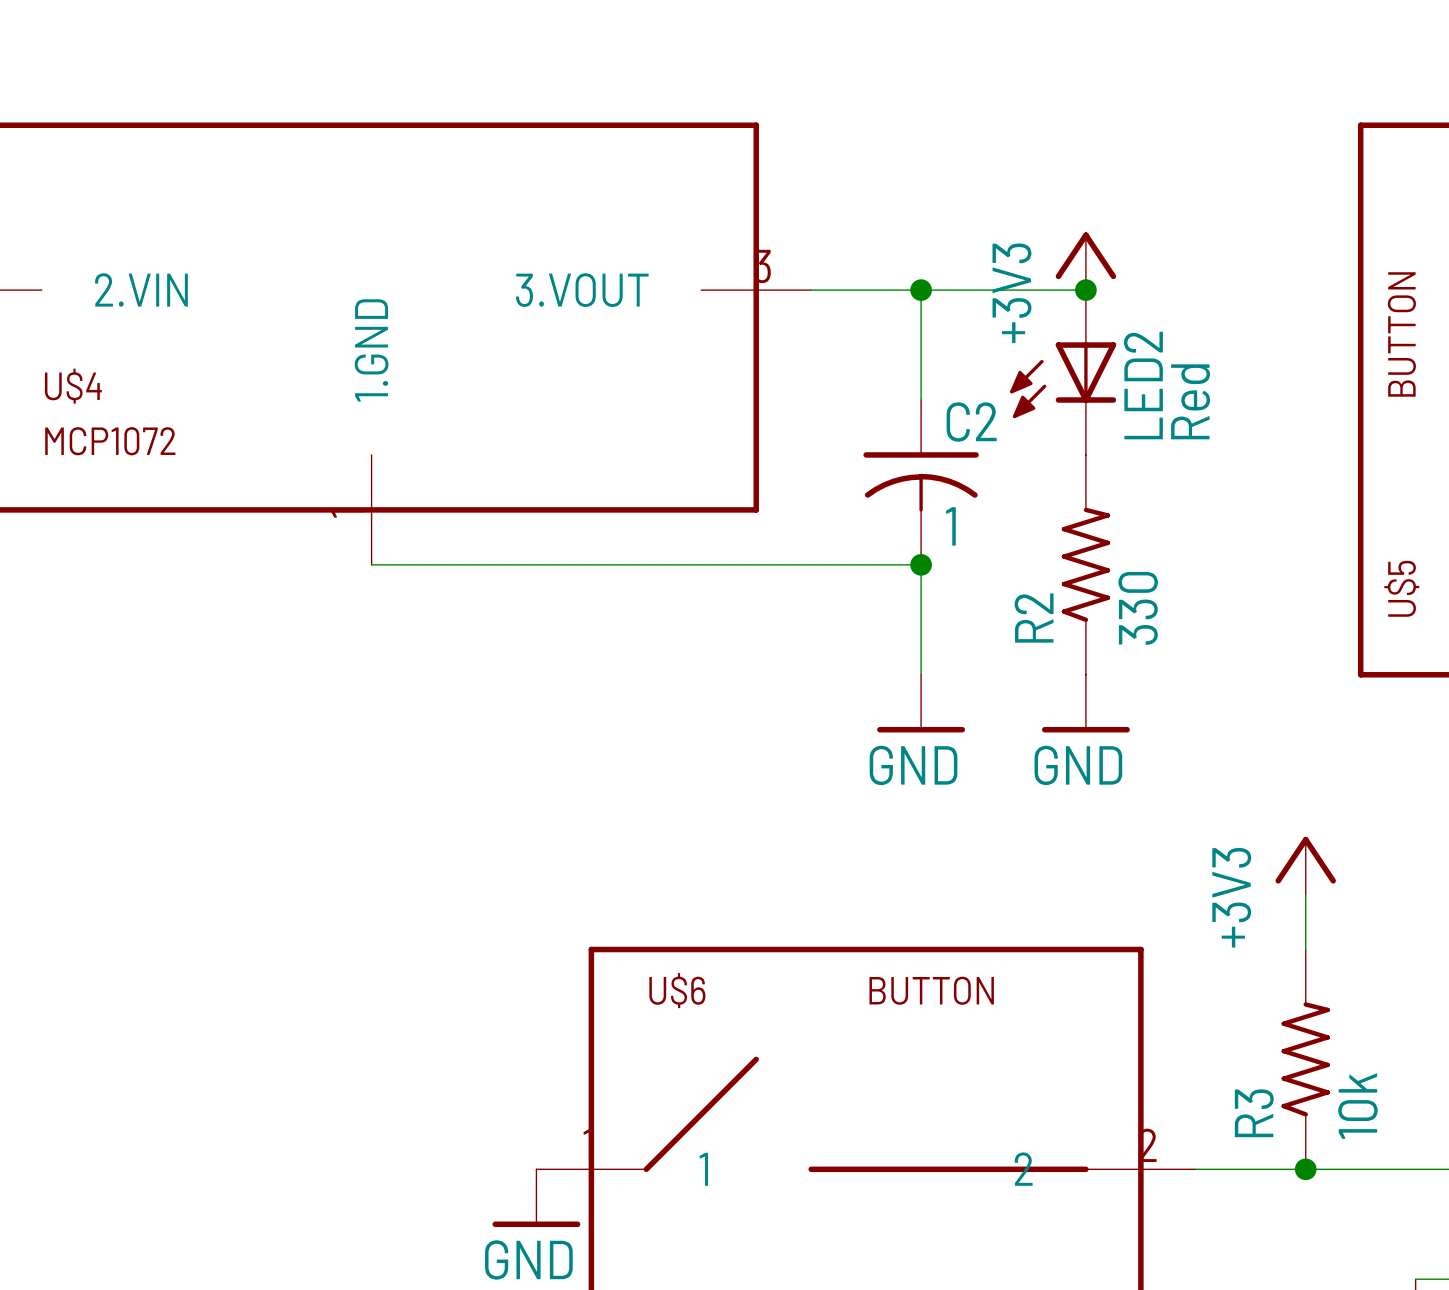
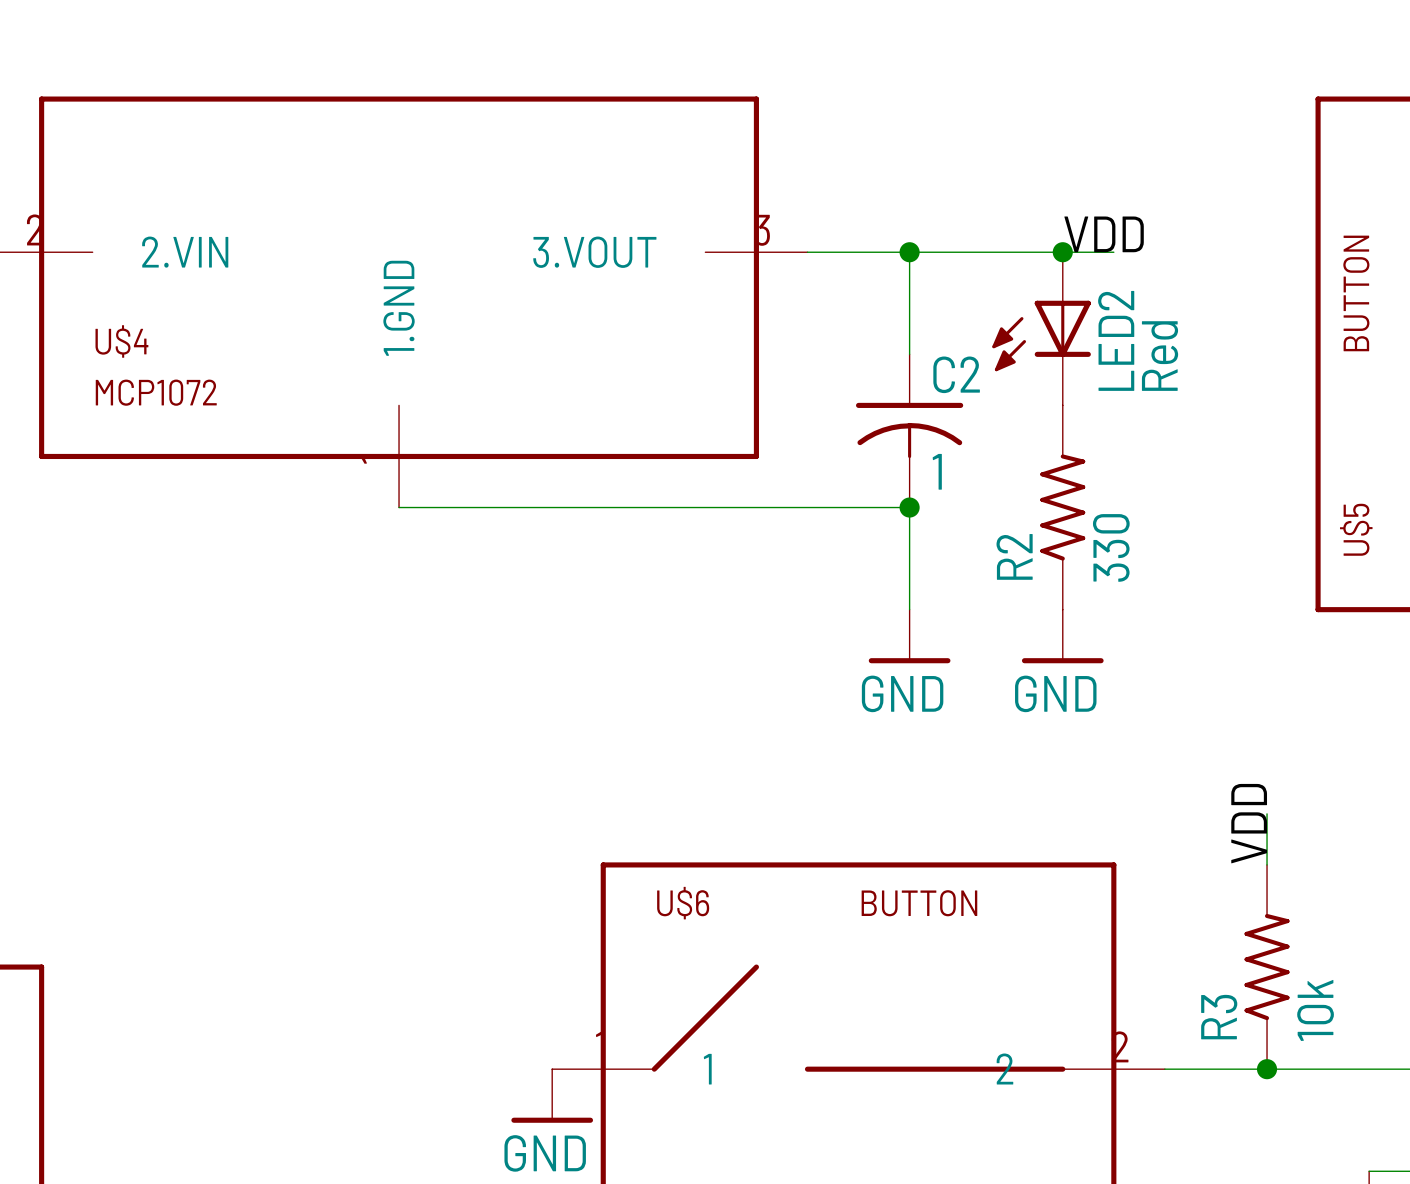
power symbol: +3V3 (1085, 261) -> none
label: none -> VDD (1104, 234)
wire: none -> (1062, 252) (1113, 252)
power symbol: +3V3 (1305, 865) -> none
label: none -> VDD (1249, 823)

